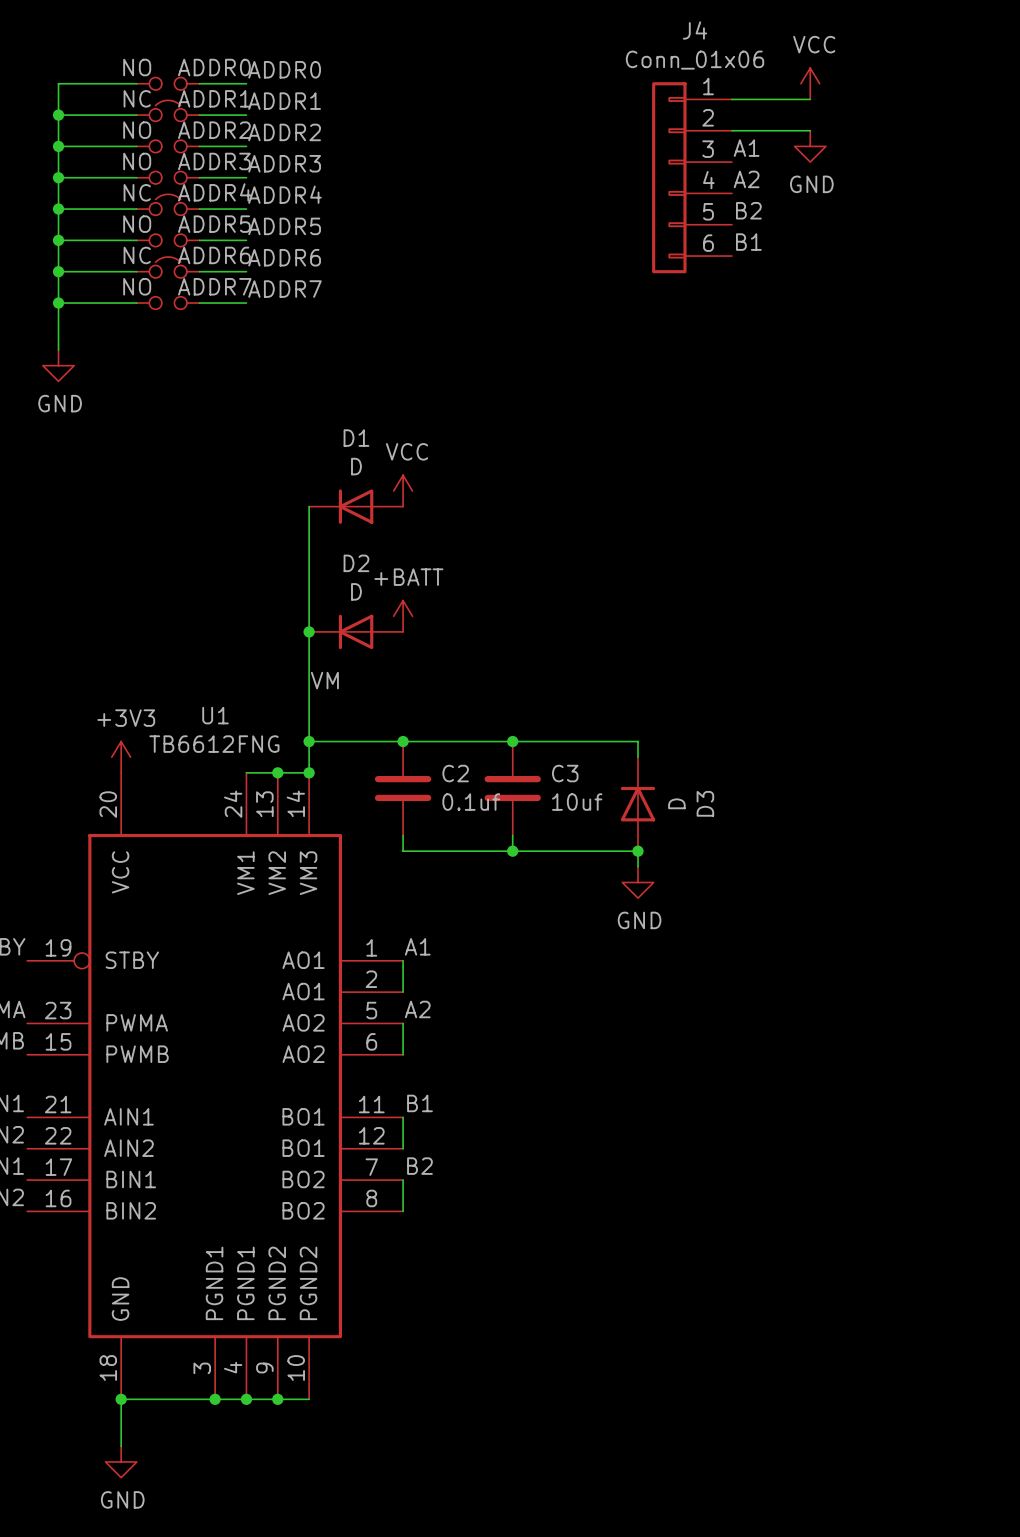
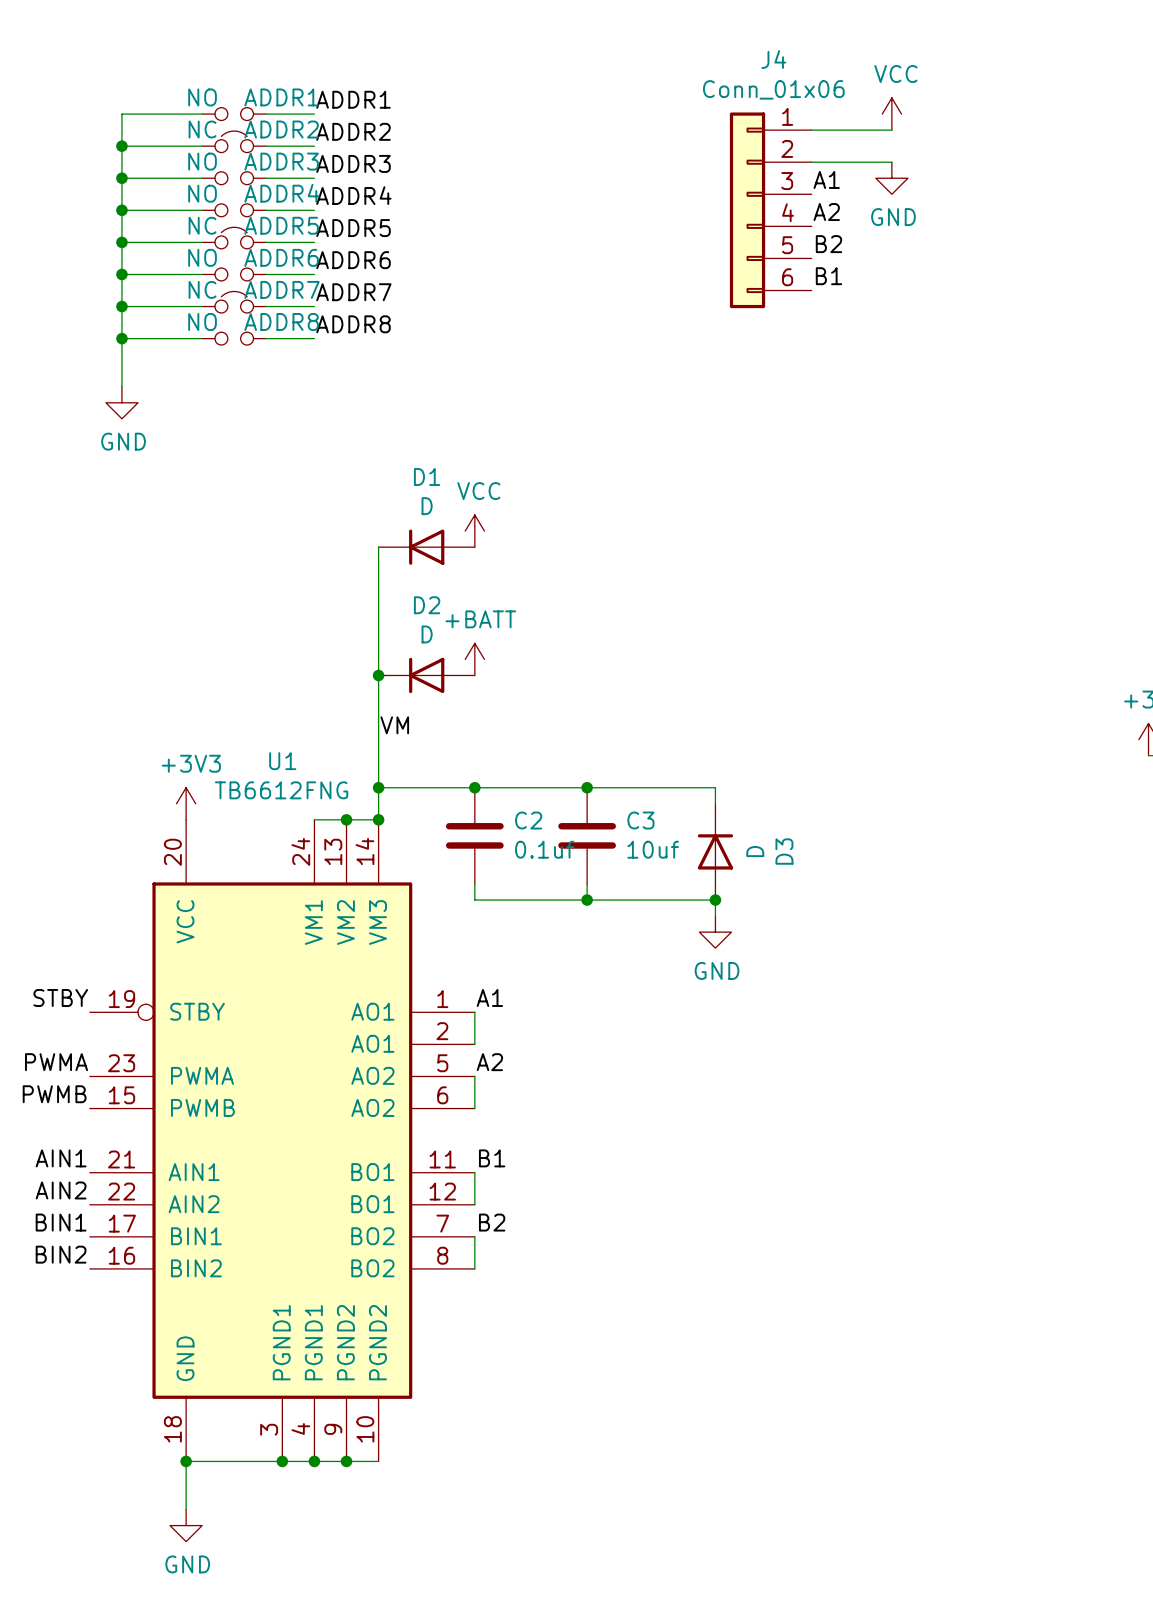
ADDR0 name: ADDR0 (214, 67) -> ADDR1 (281, 97)
label: ADDR0 (284, 69) -> ADDR1 (353, 99)
ADDR1 name: ADDR1 (214, 98) -> ADDR2 (281, 129)
label: ADDR1 (284, 101) -> ADDR2 (353, 131)
ADDR2 name: ADDR2 (214, 130) -> ADDR3 (281, 161)
label: ADDR2 (284, 132) -> ADDR3 (353, 163)
ADDR3 name: ADDR3 (214, 161) -> ADDR4 (281, 193)
label: ADDR3 (284, 163) -> ADDR4 (353, 195)
ADDR4 name: ADDR4 (214, 192) -> ADDR5 (281, 225)
label: ADDR4 (284, 194) -> ADDR5 (353, 228)
ADDR5 name: ADDR5 (214, 224) -> ADDR6 (281, 257)
label: ADDR5 (284, 226) -> ADDR6 (353, 260)
ADDR6 name: ADDR6 (214, 255) -> ADDR7 (281, 289)
label: ADDR6 (284, 257) -> ADDR7 (353, 292)
ADDR7 name: ADDR7 (214, 286) -> ADDR8 (281, 321)
label: ADDR7 (284, 289) -> ADDR8 (353, 324)

